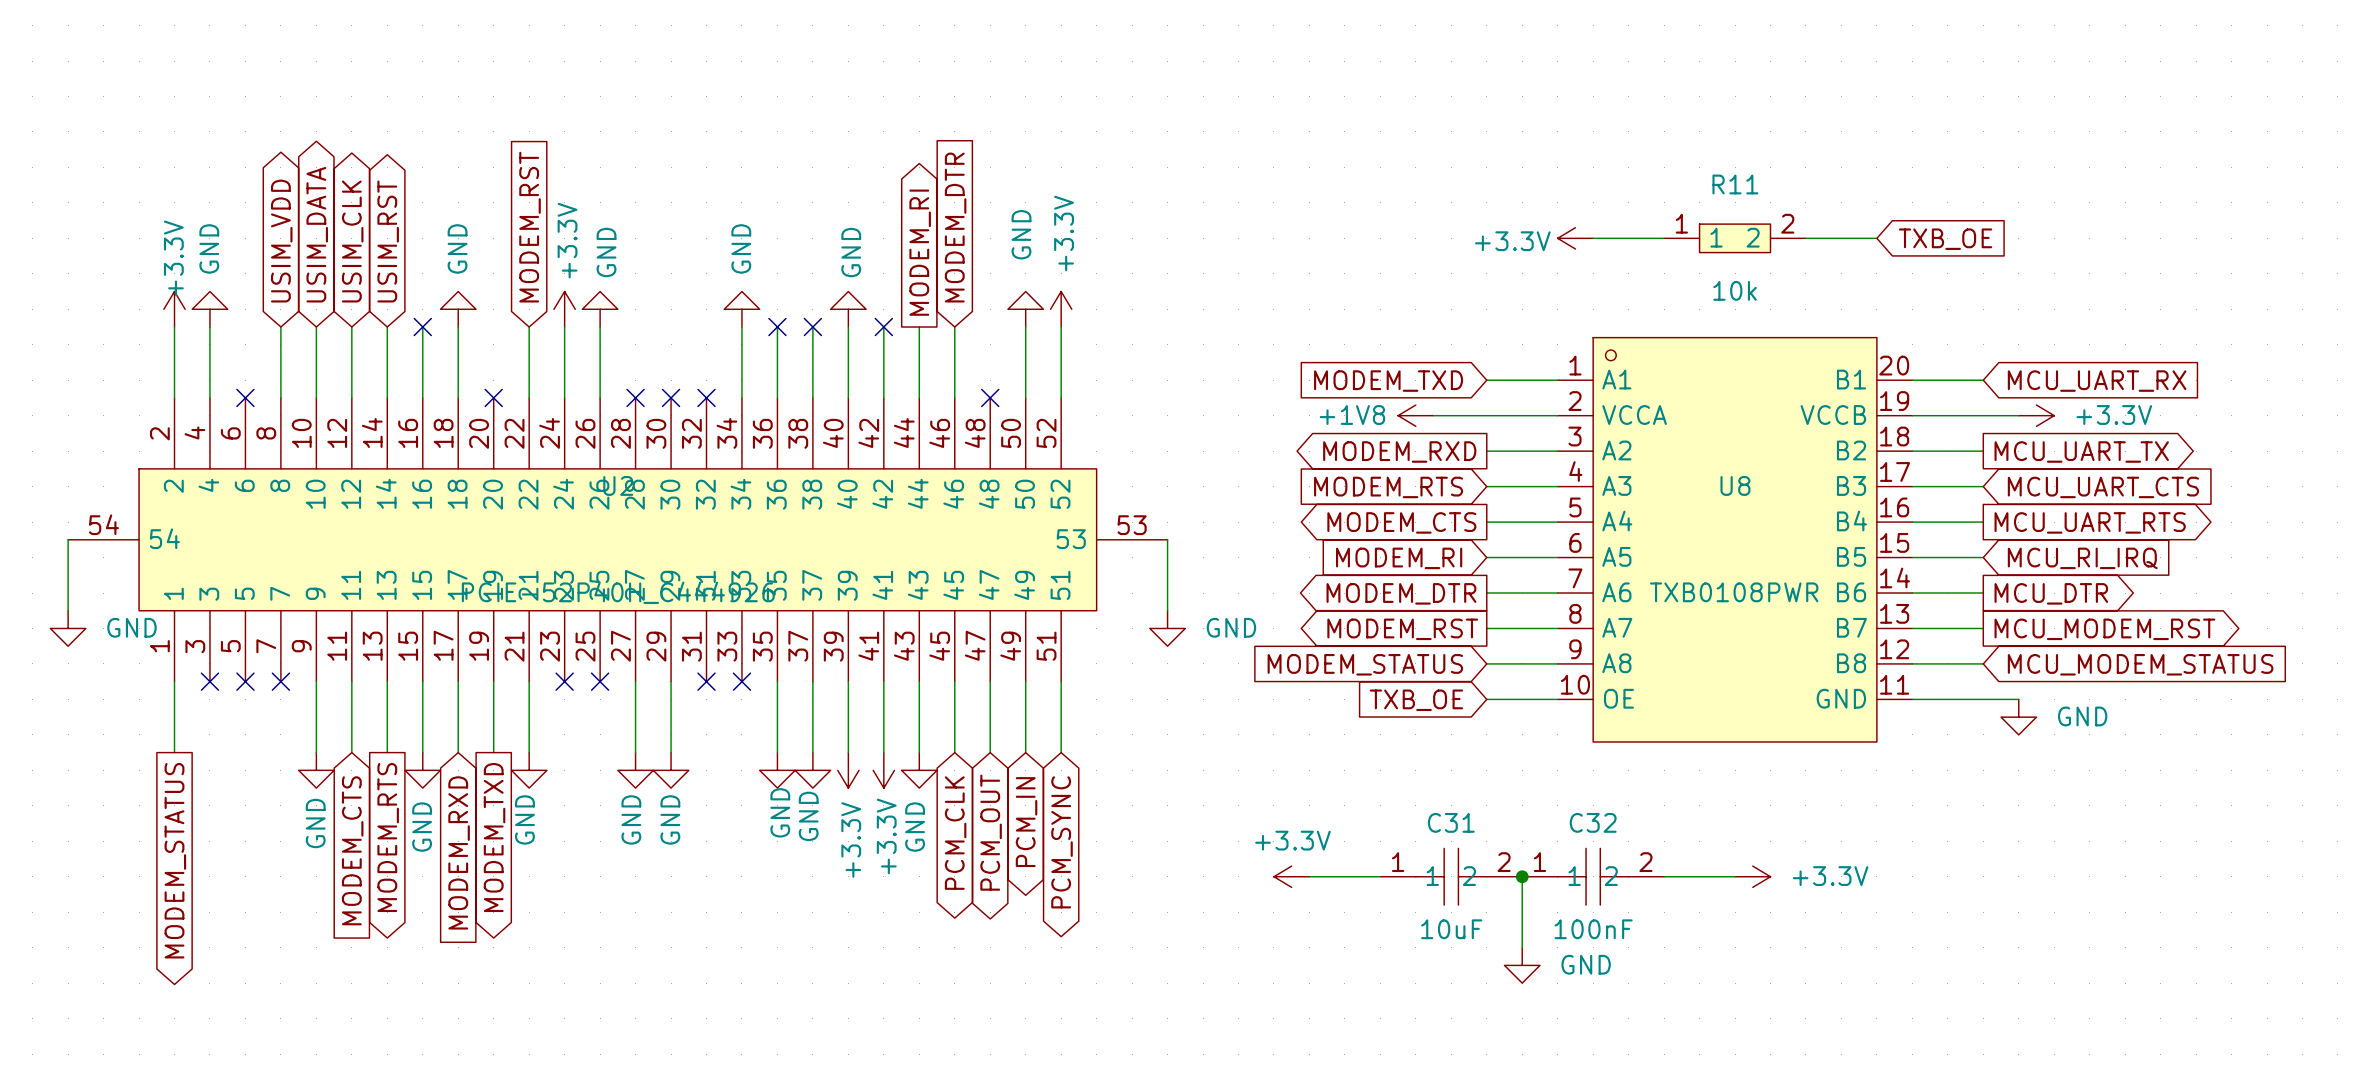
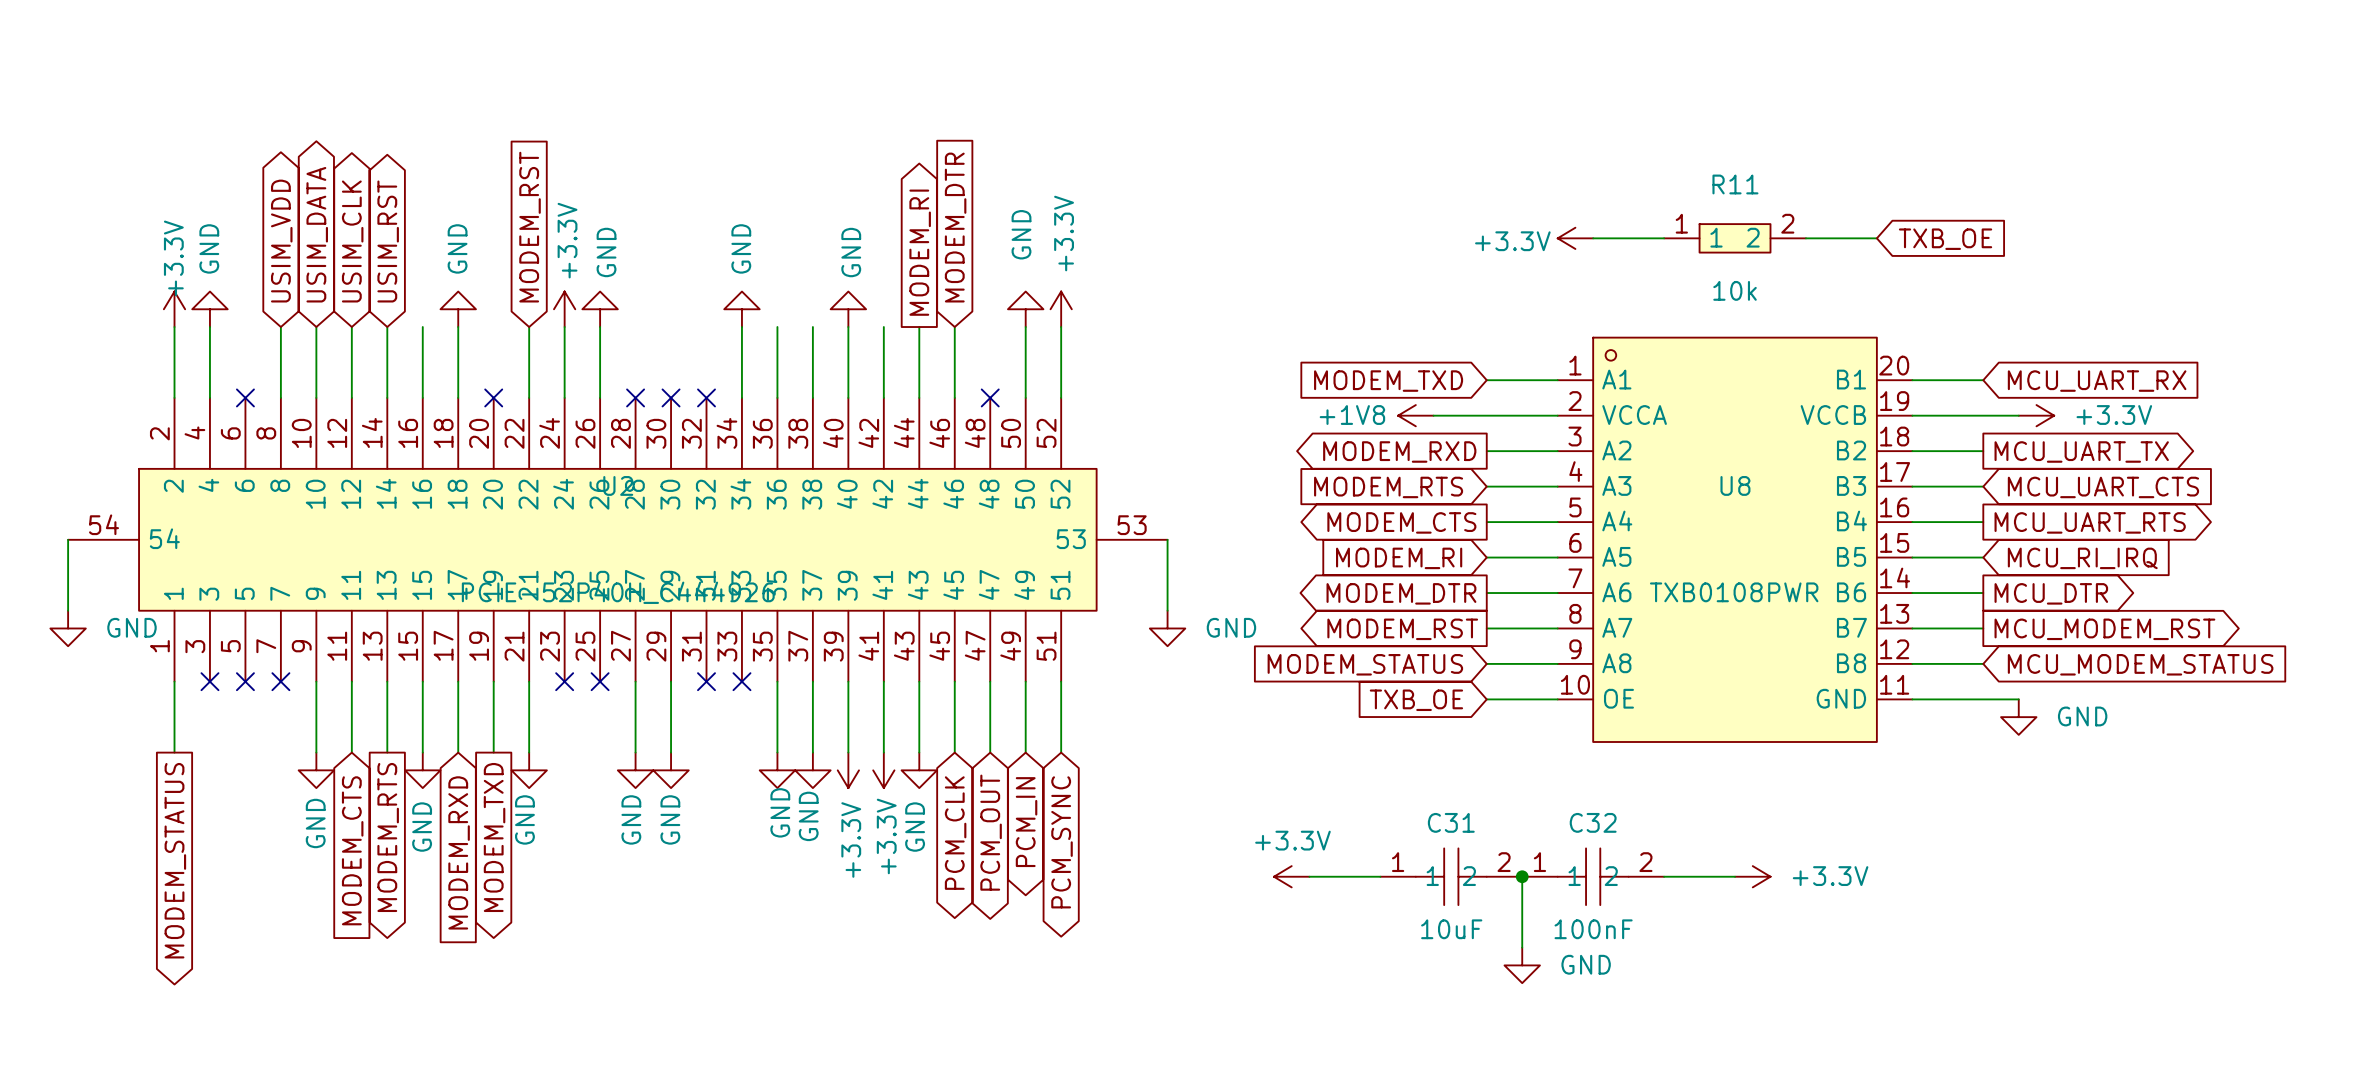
no-connect mark: (422, 327) -> none
no-connect mark: (777, 327) -> none
no-connect mark: (812, 327) -> none
no-connect mark: (883, 327) -> none

